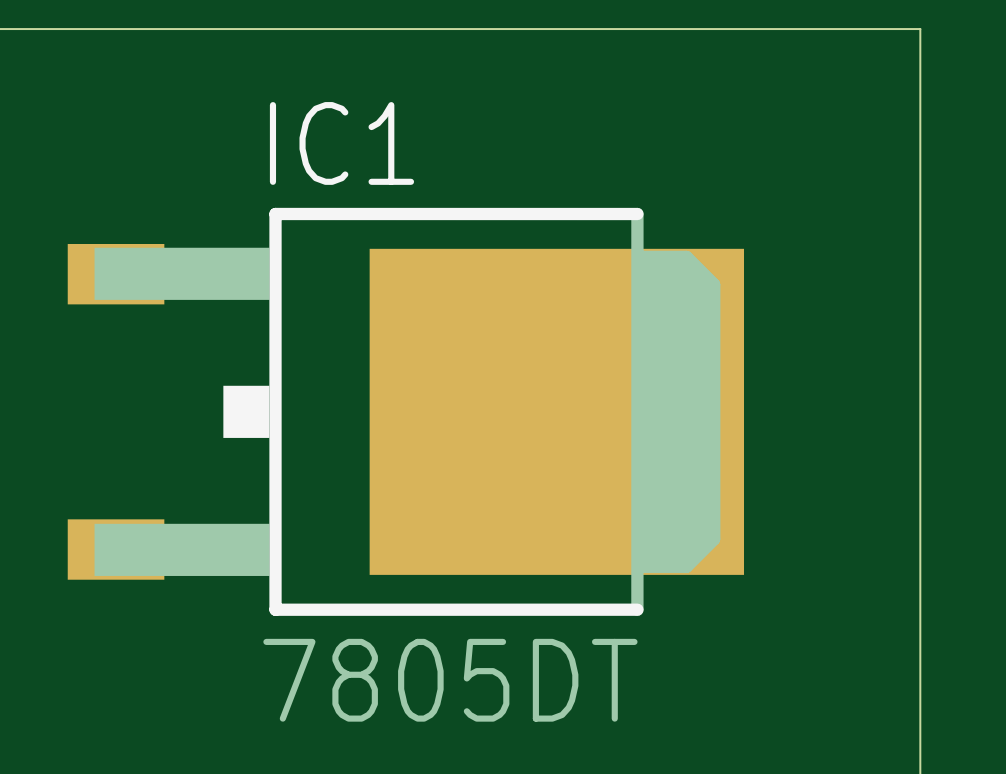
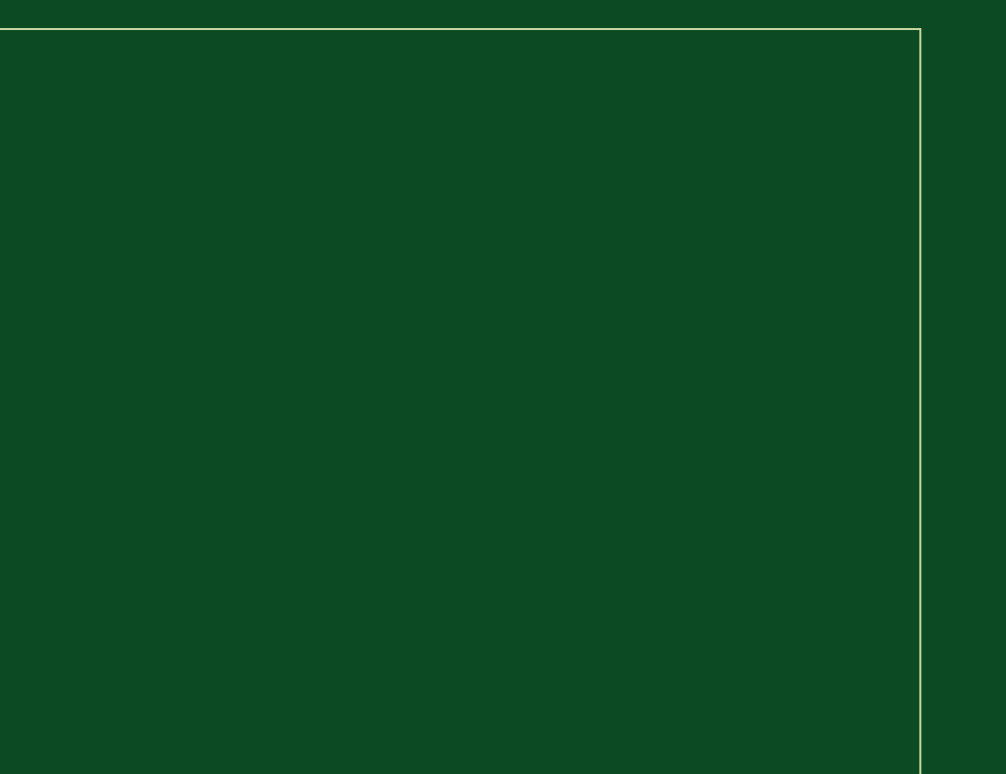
IC1: 7805DT (405, 411) -> none

